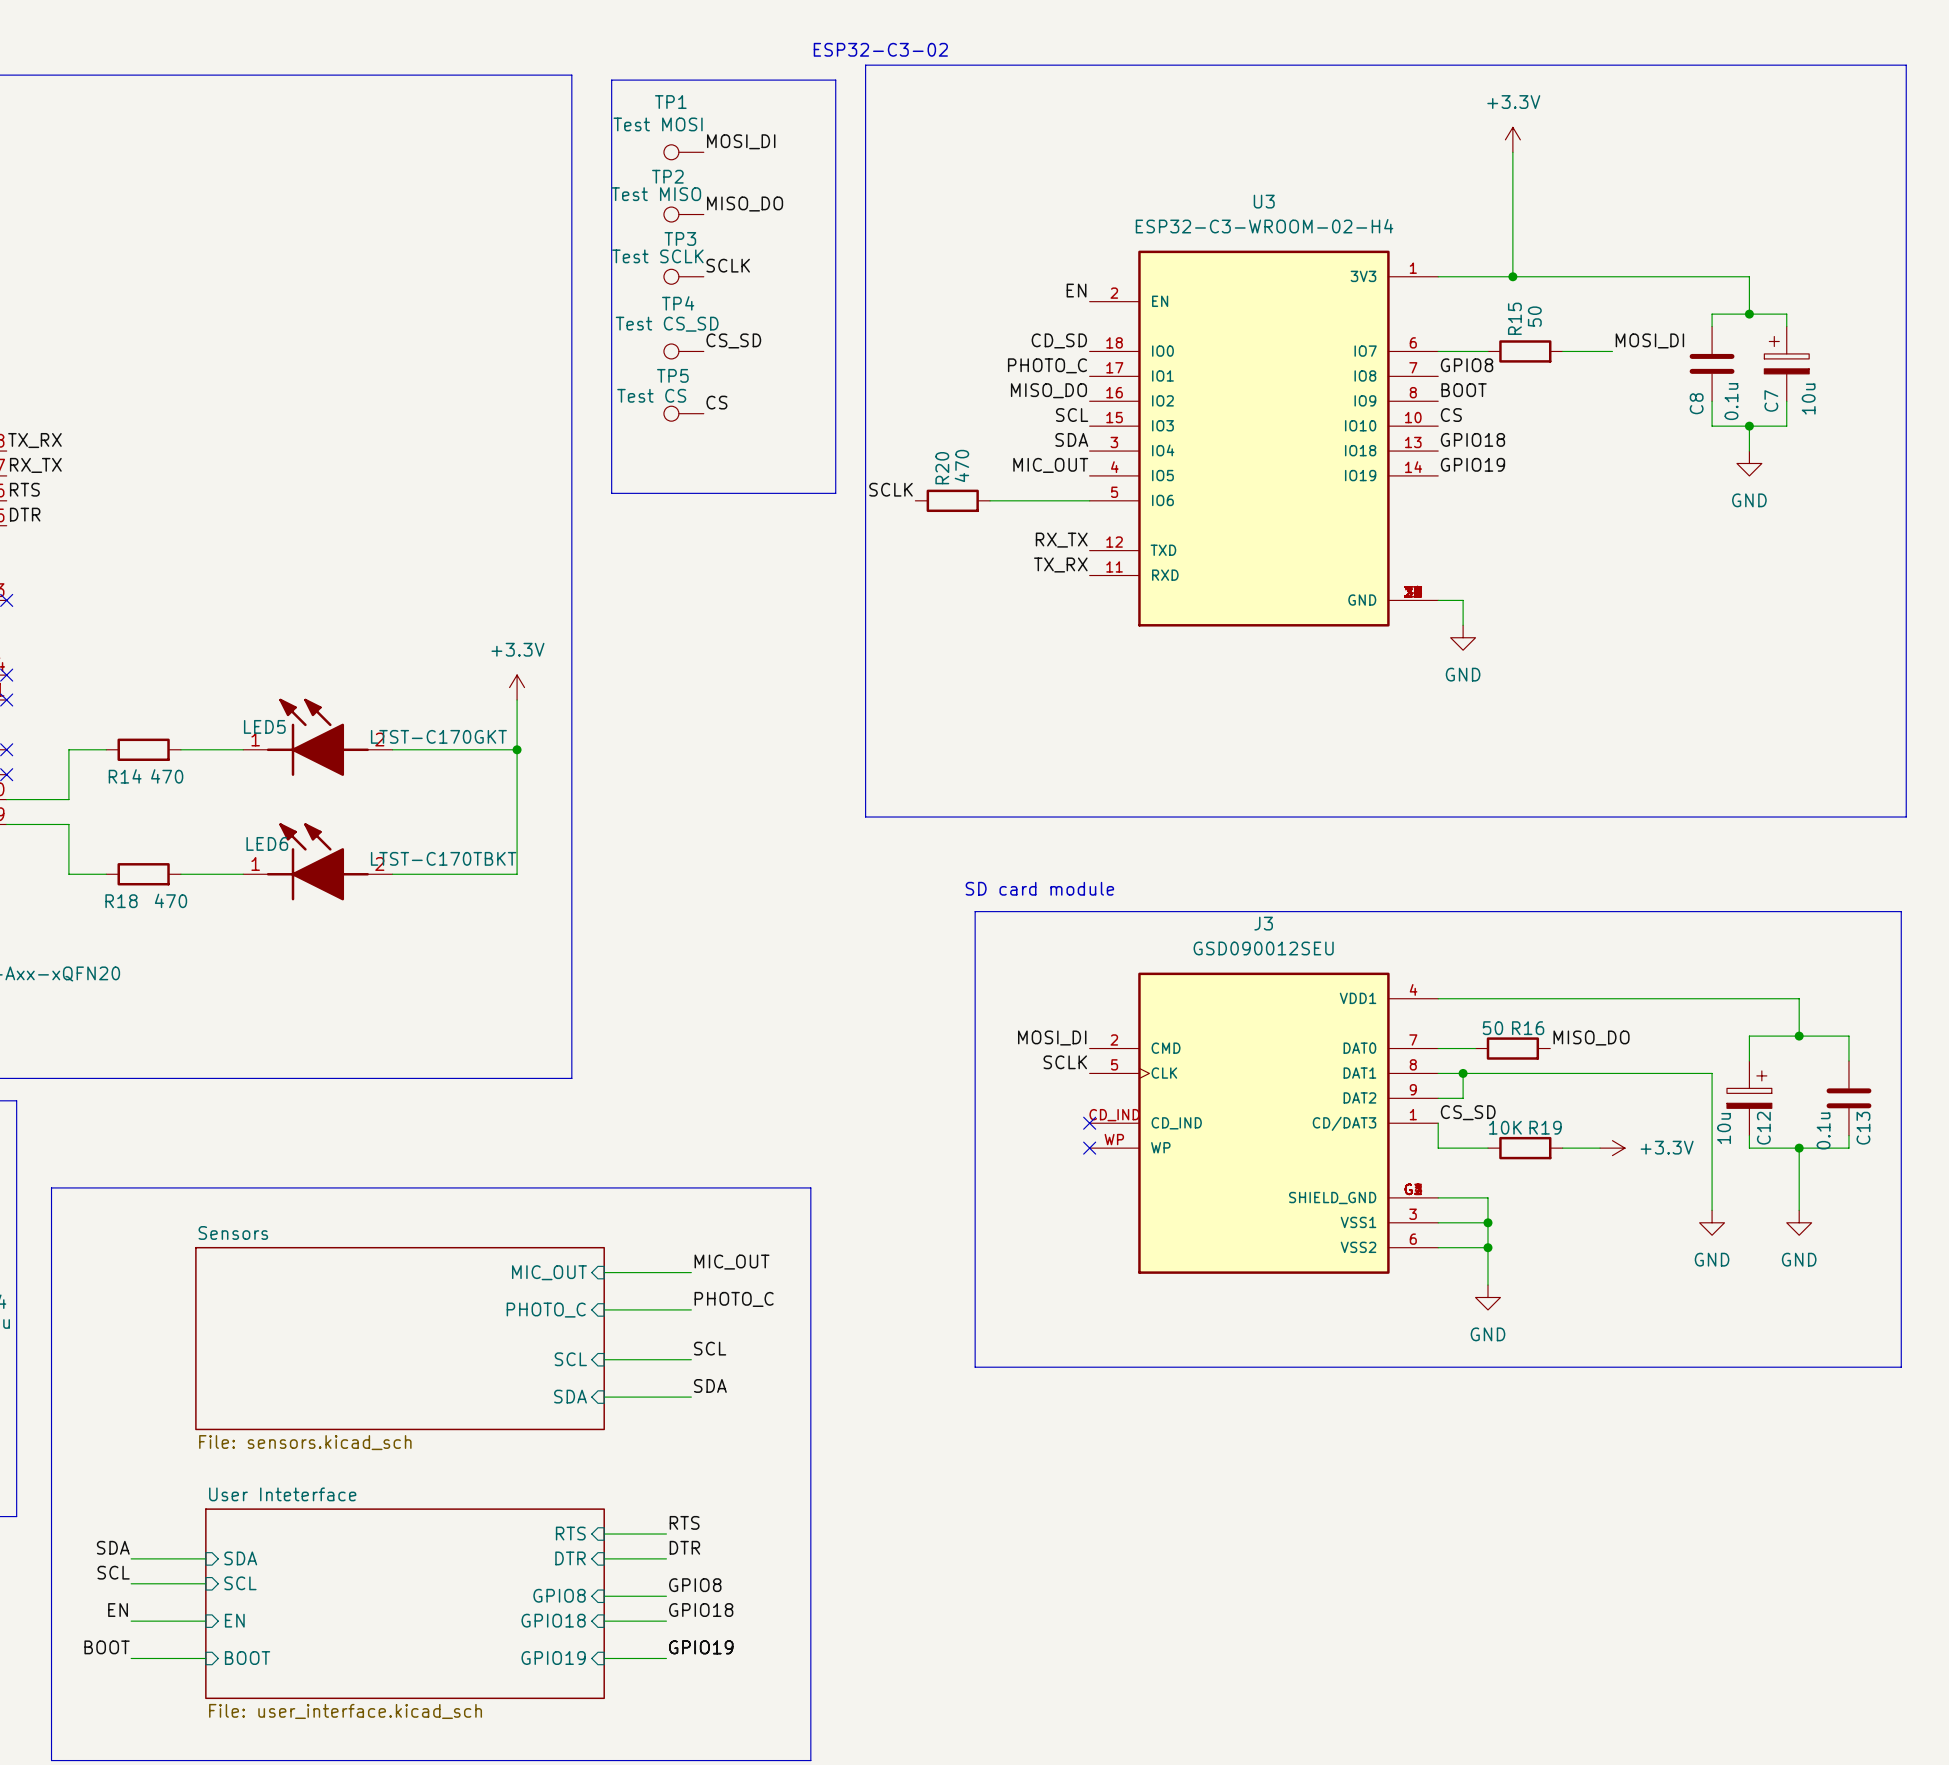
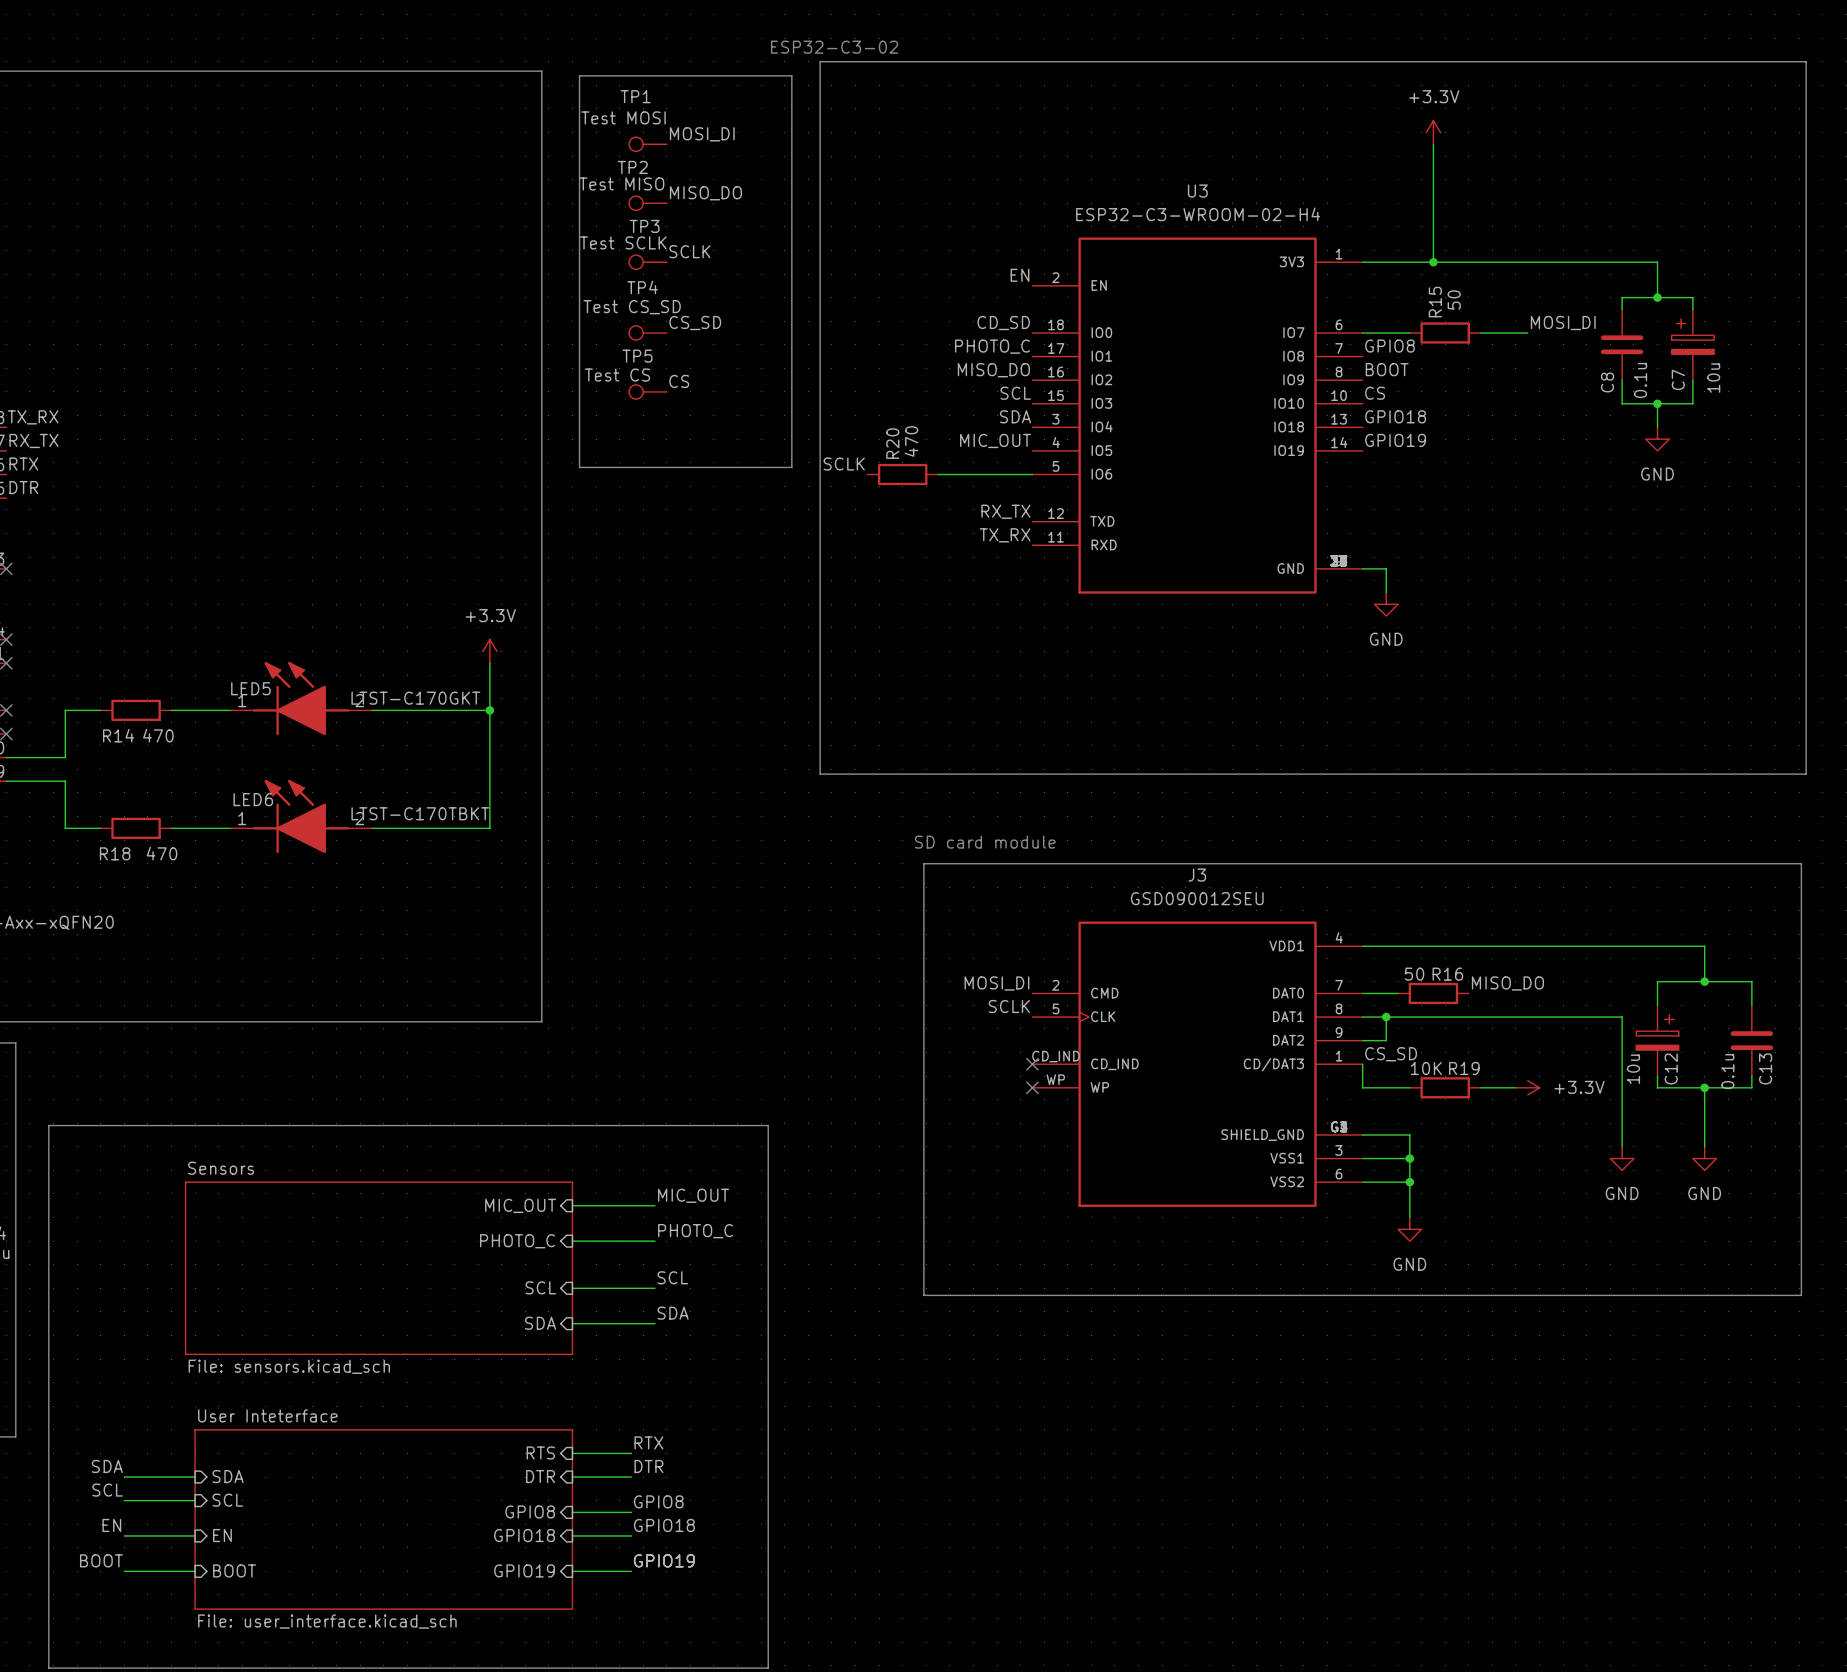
label: RTS (24, 489) -> RTX (23, 464)
label: RTS (684, 1522) -> RTX (648, 1442)

